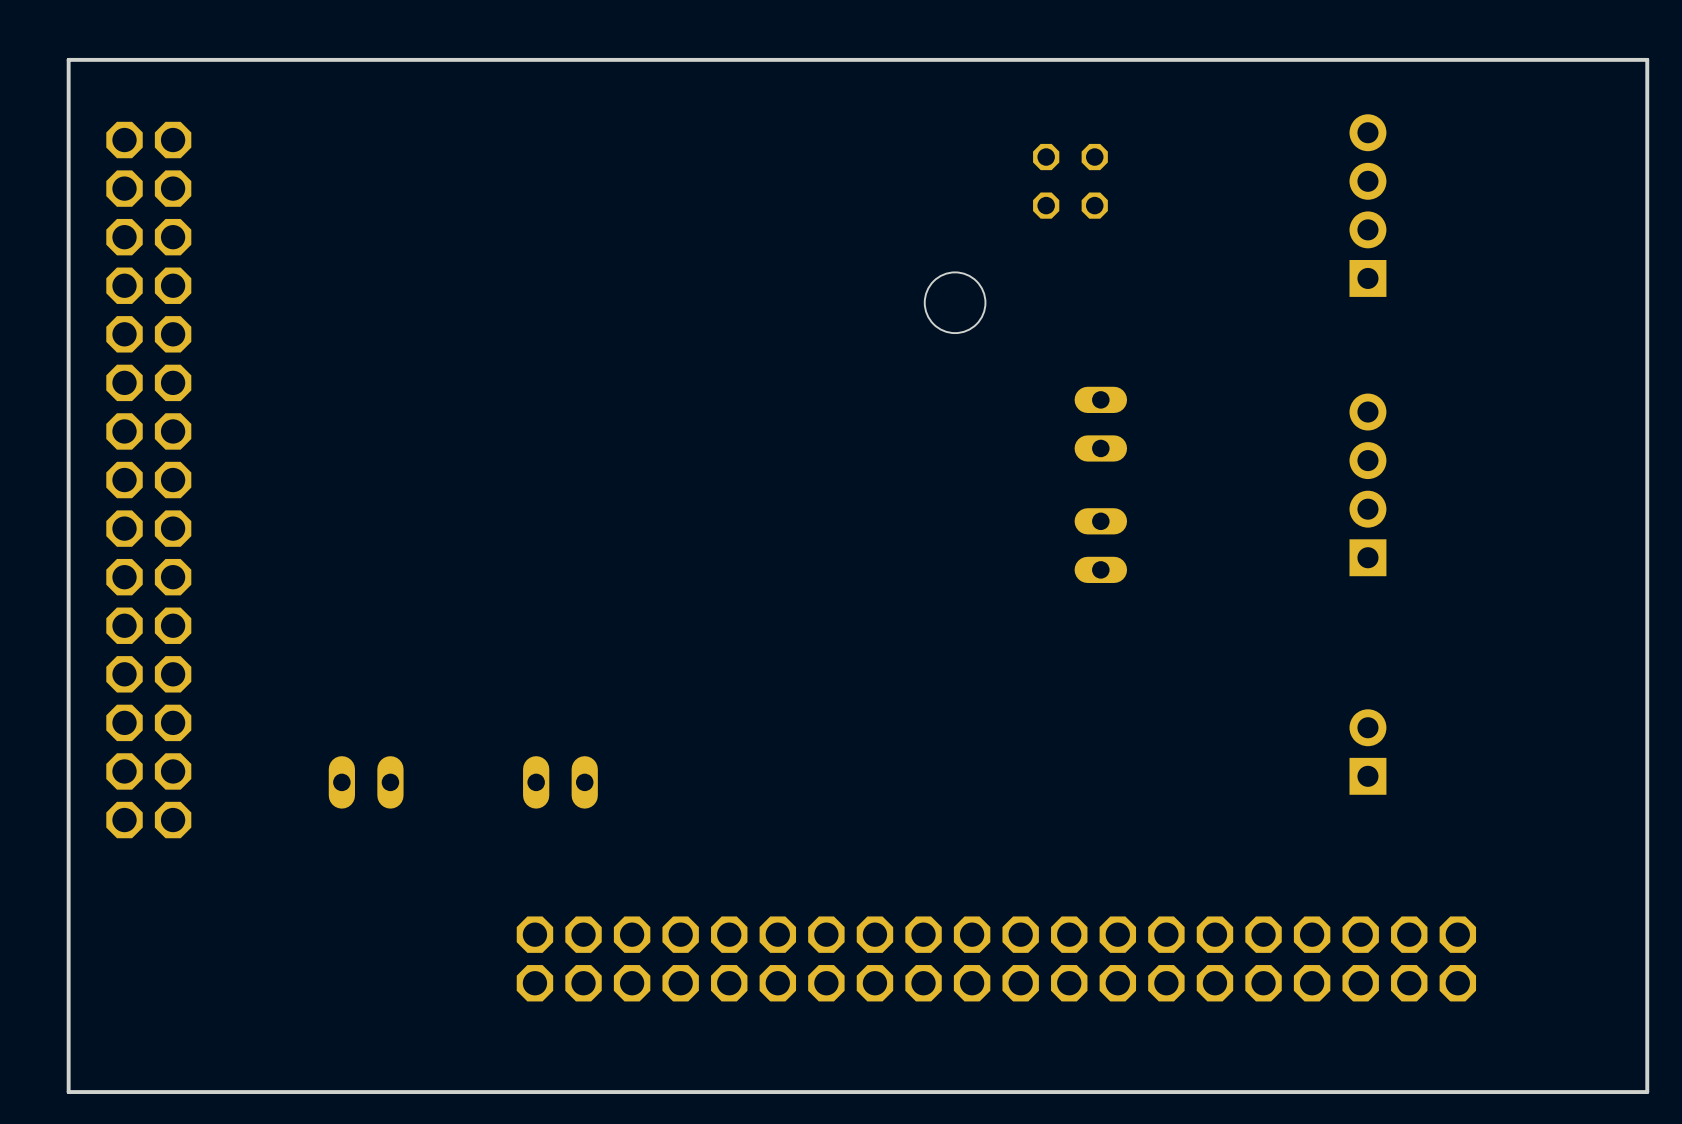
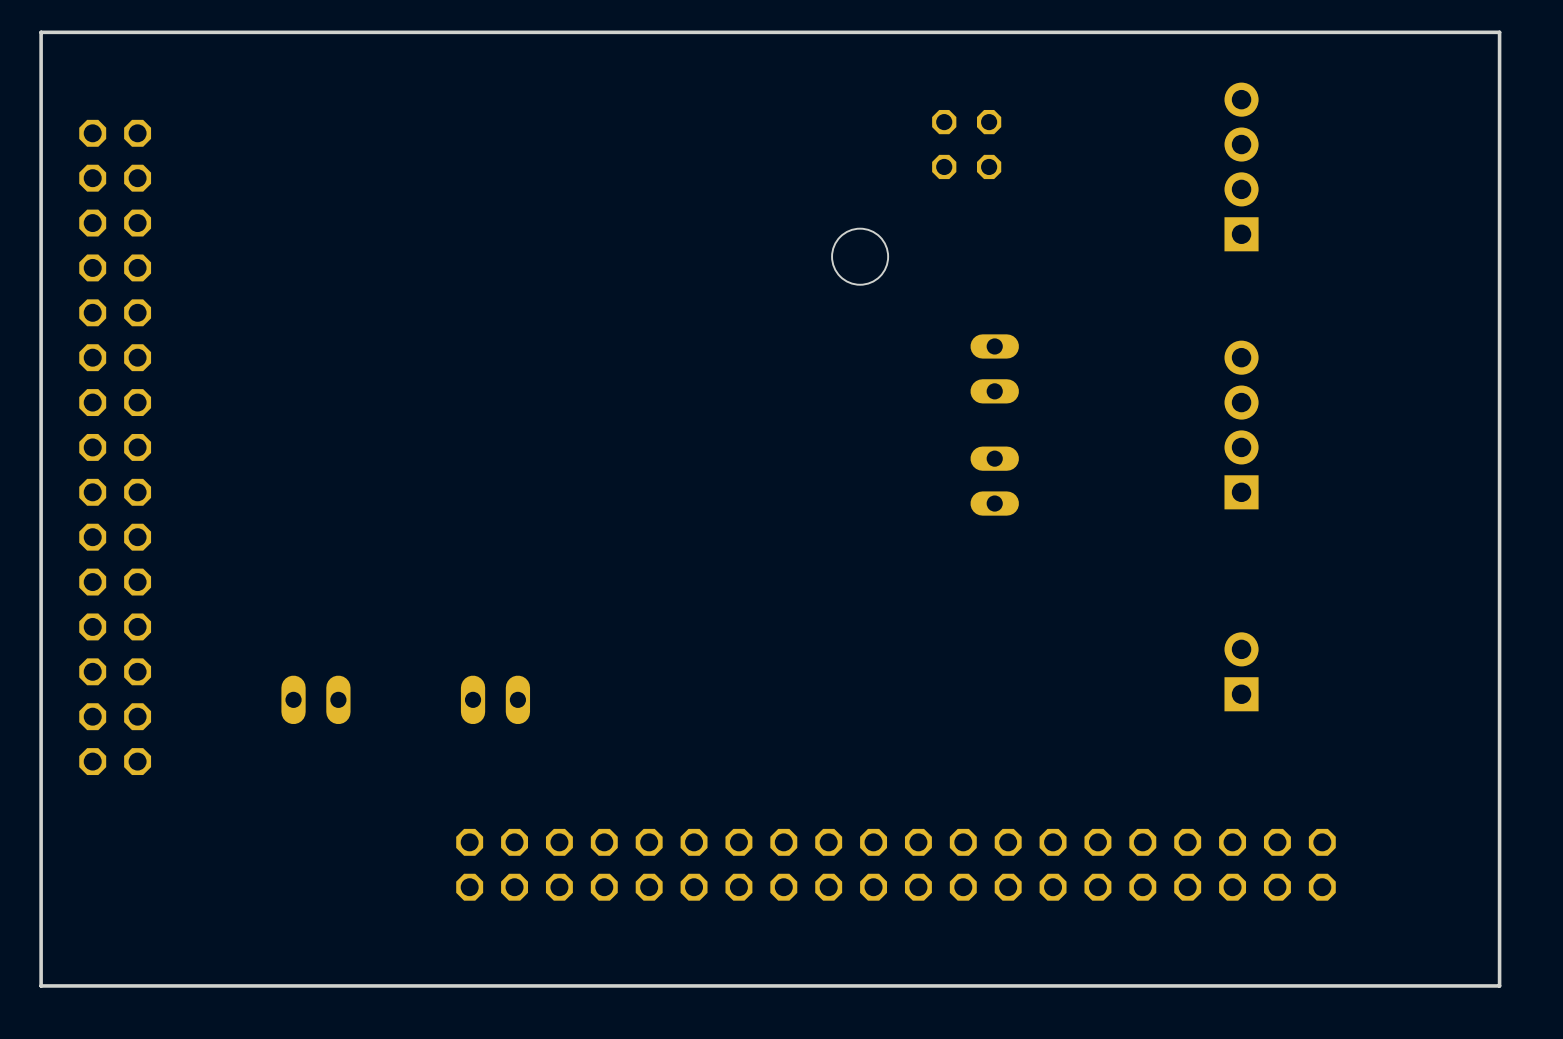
part: (148, 480) -> none
part: none -> (115, 447)
part footprint: [516, 916, 1477, 1002] -> [456, 828, 1336, 901]

